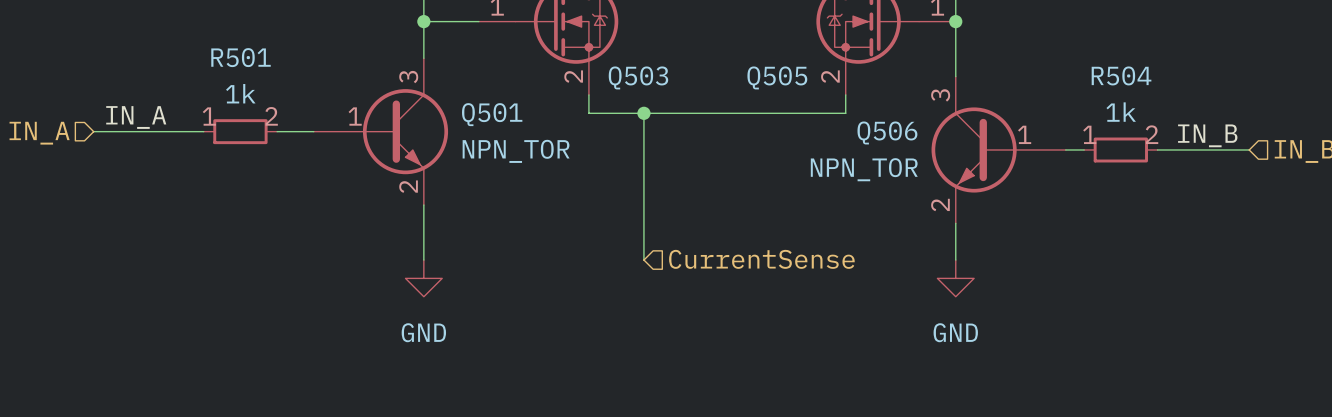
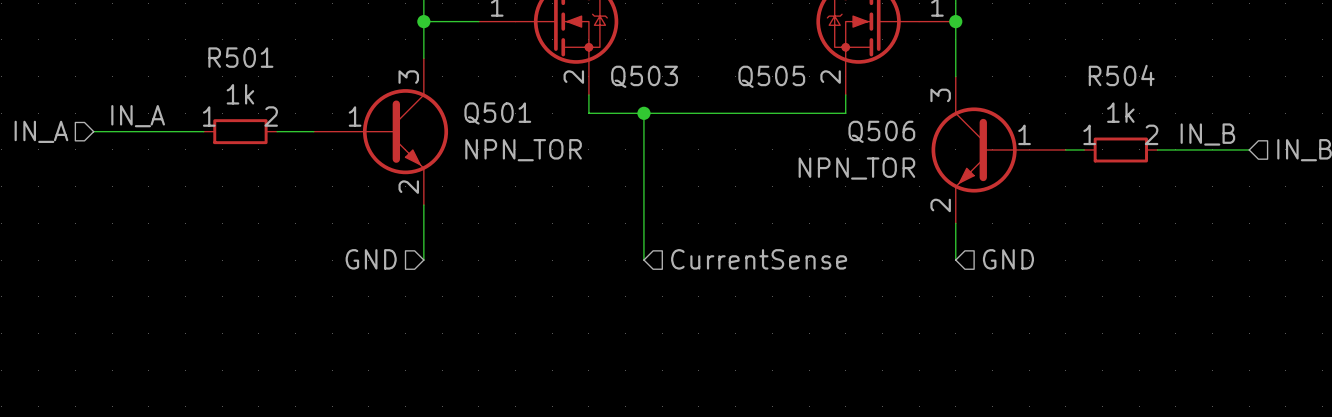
hierarchical label: none -> GND (371, 259)
hierarchical label: none -> GND (1008, 259)
power symbol: GND (423, 278) -> none
power symbol: GND (955, 278) -> none

